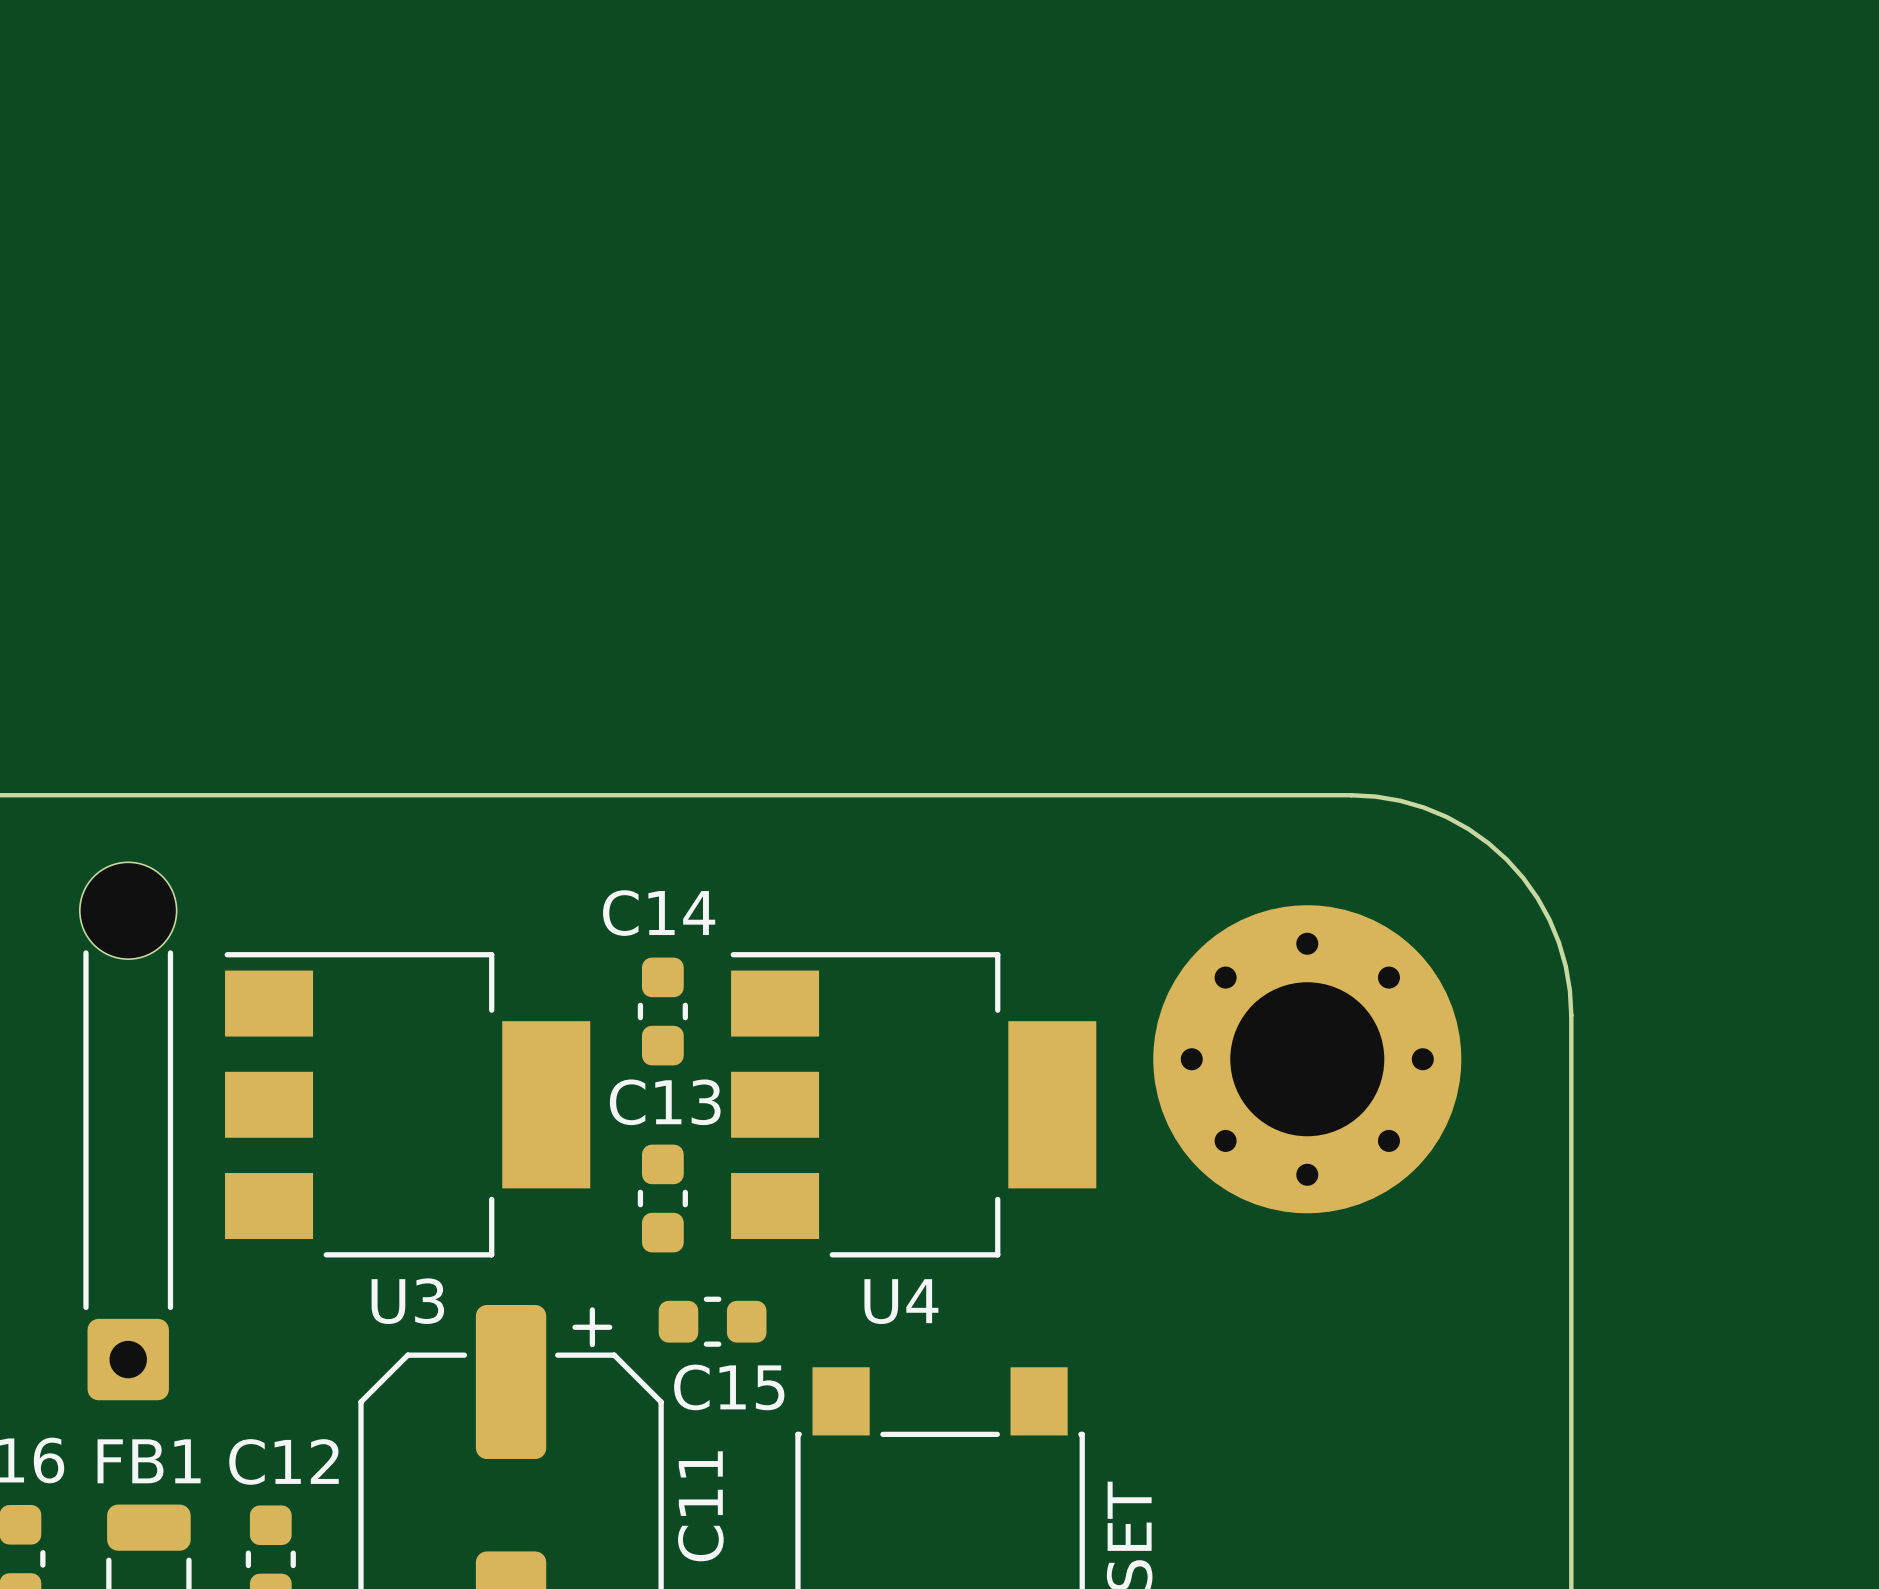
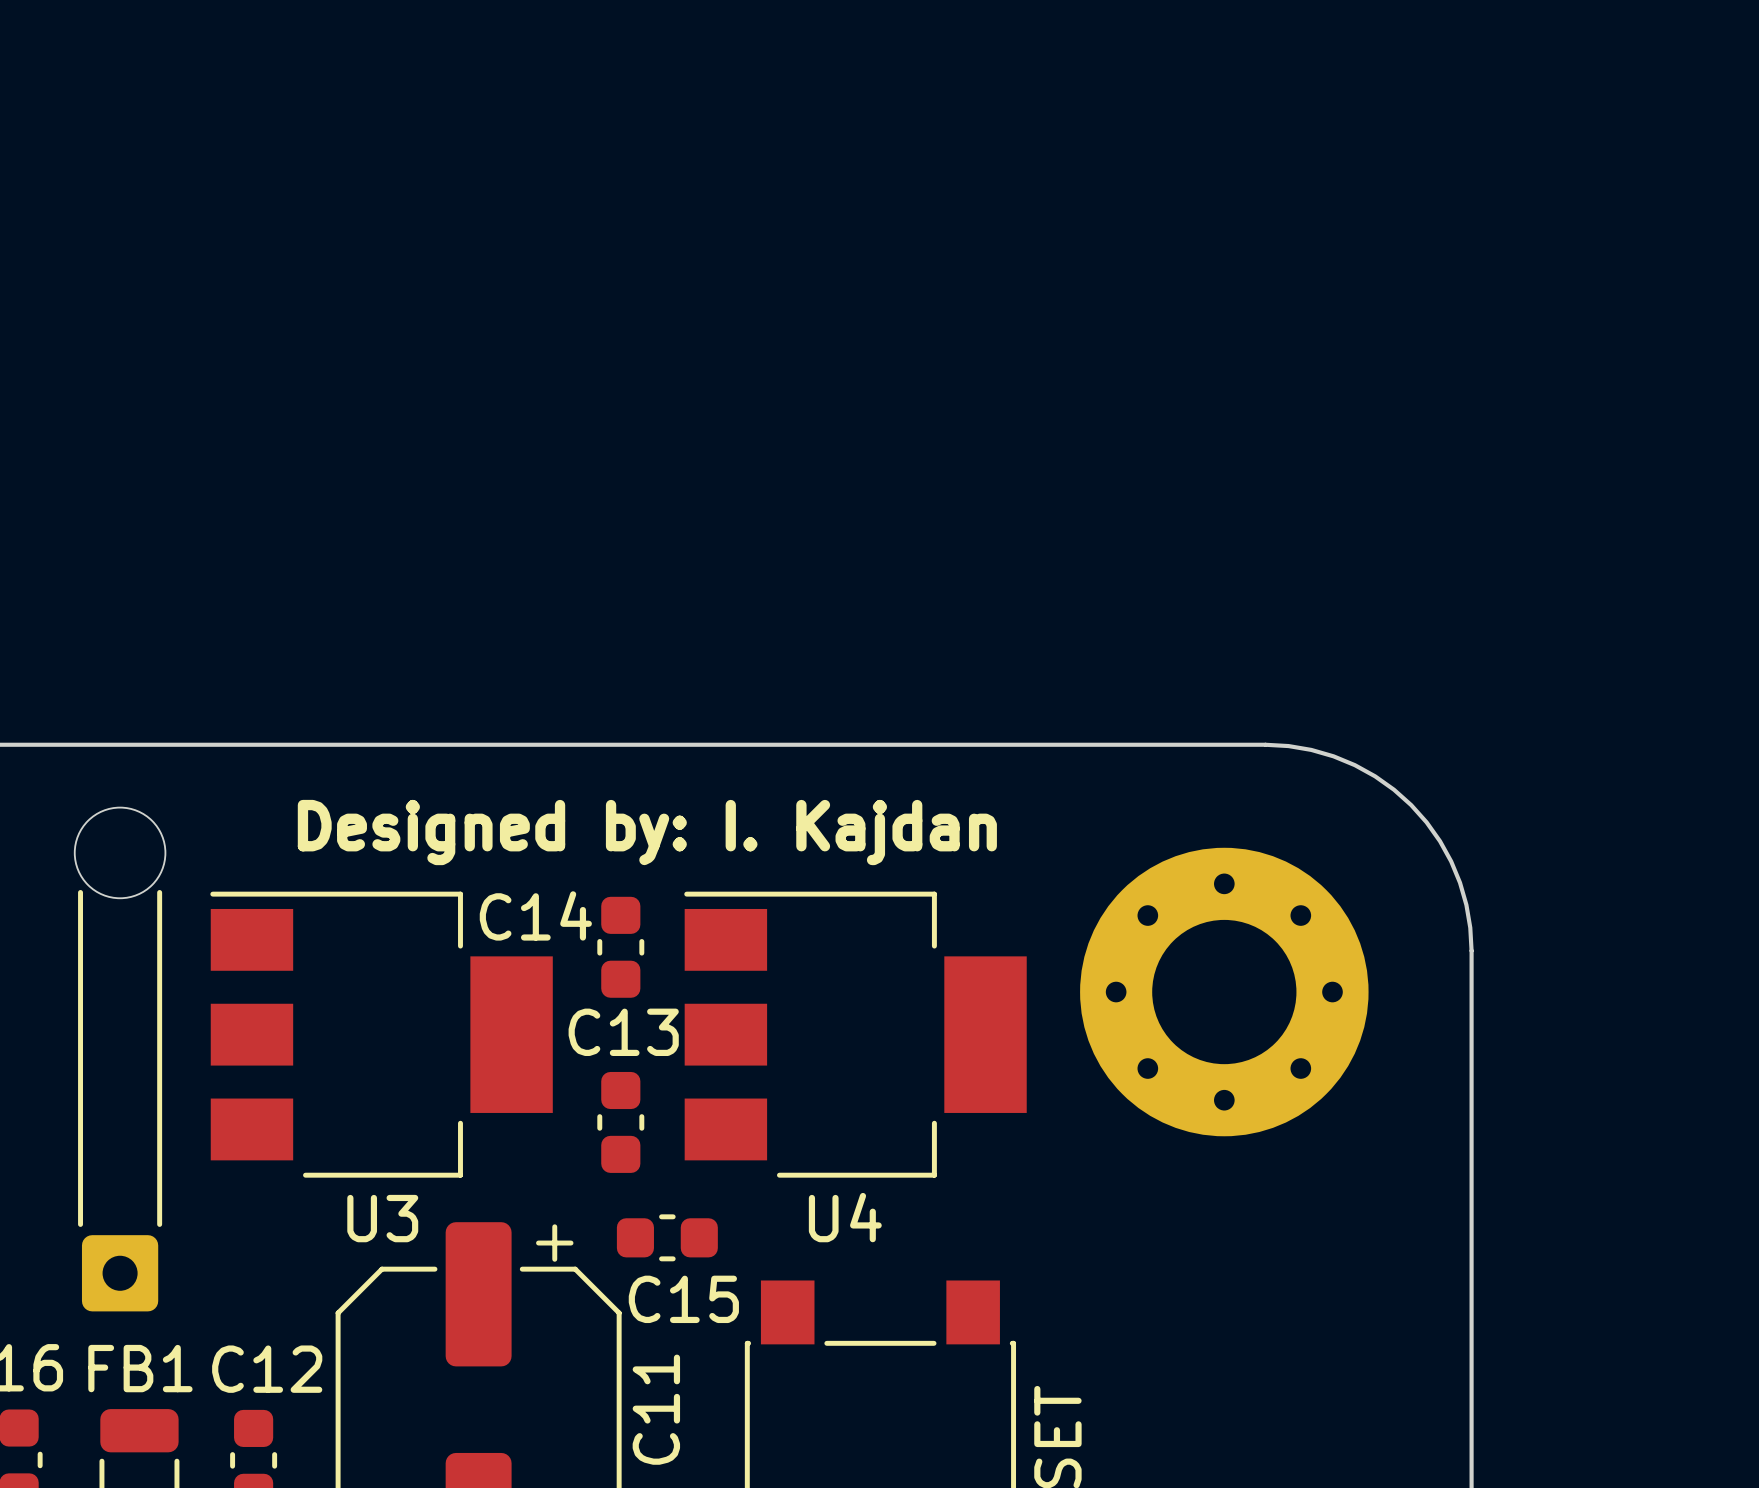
text: none -> Designed by: I. Kajdan (647, 832)
C14 name position: C14 (659, 913) -> C14 (535, 915)

